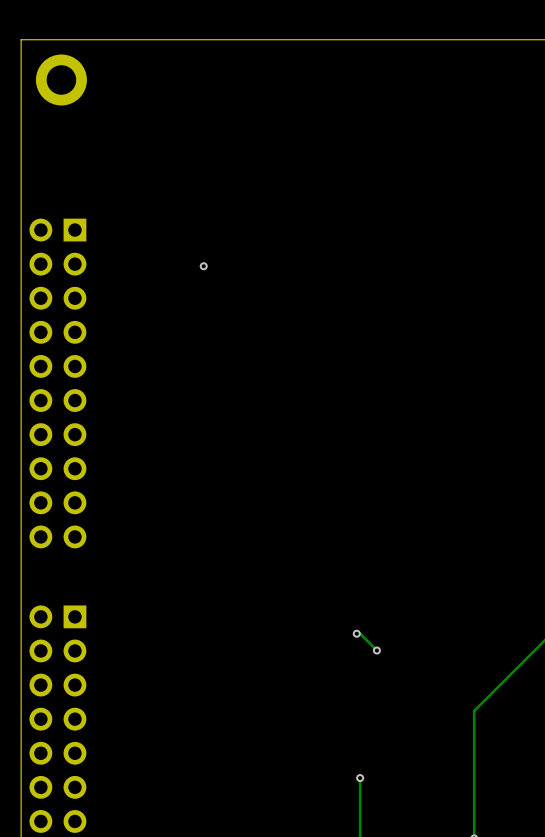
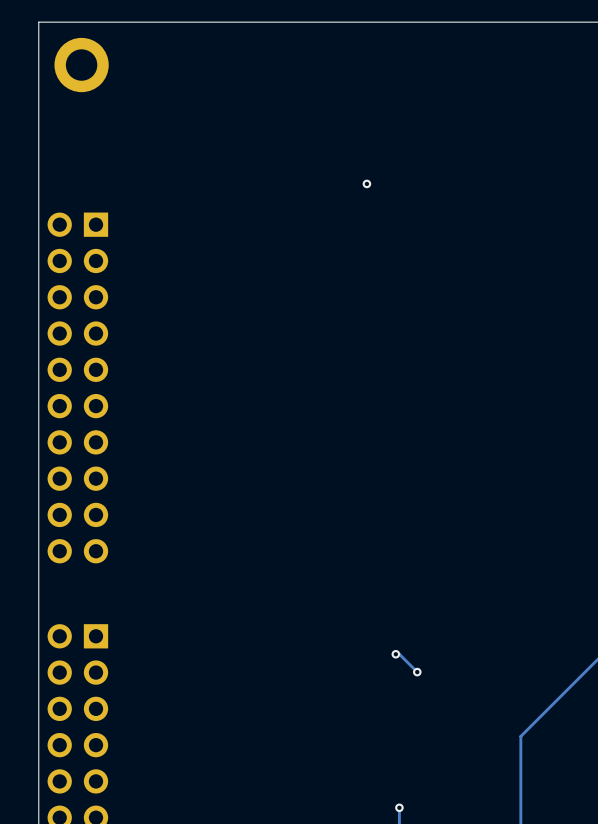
via: none -> (366, 183)
via: (203, 266) -> none

